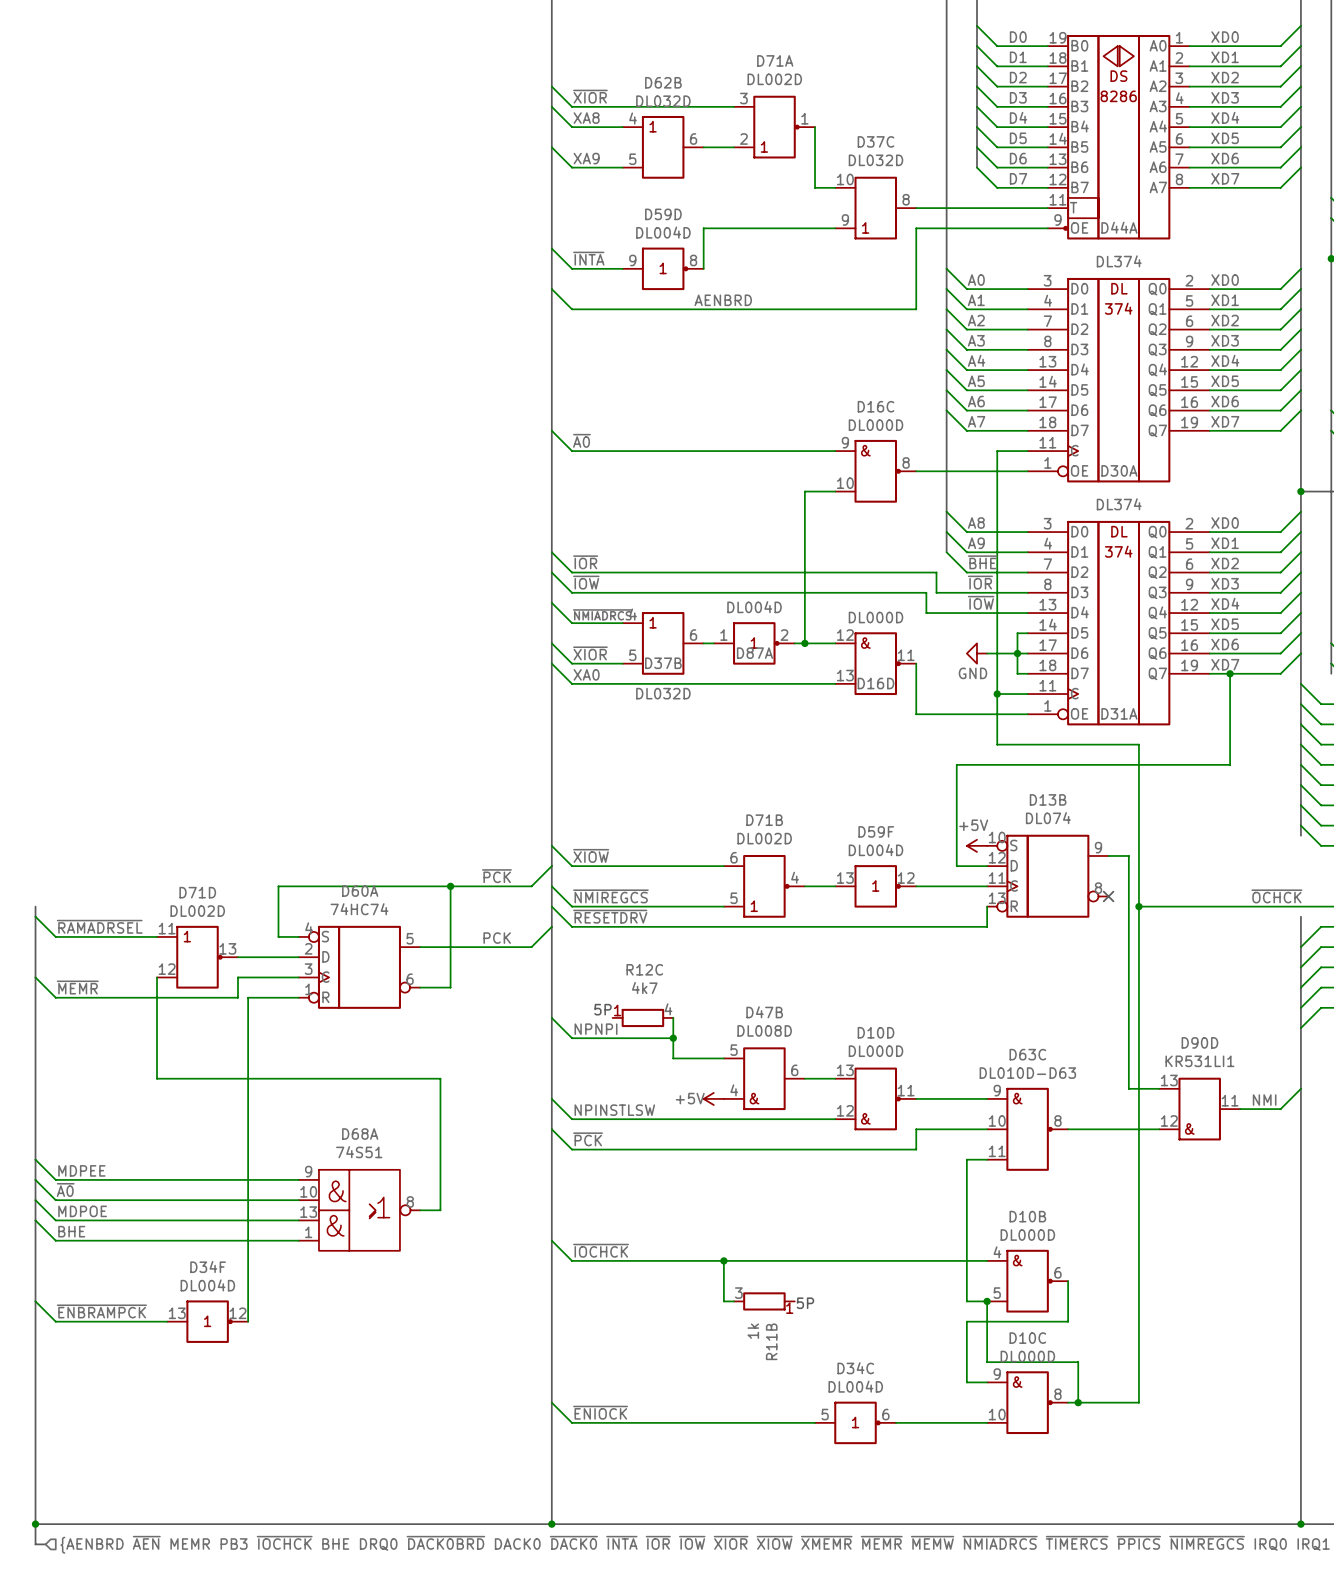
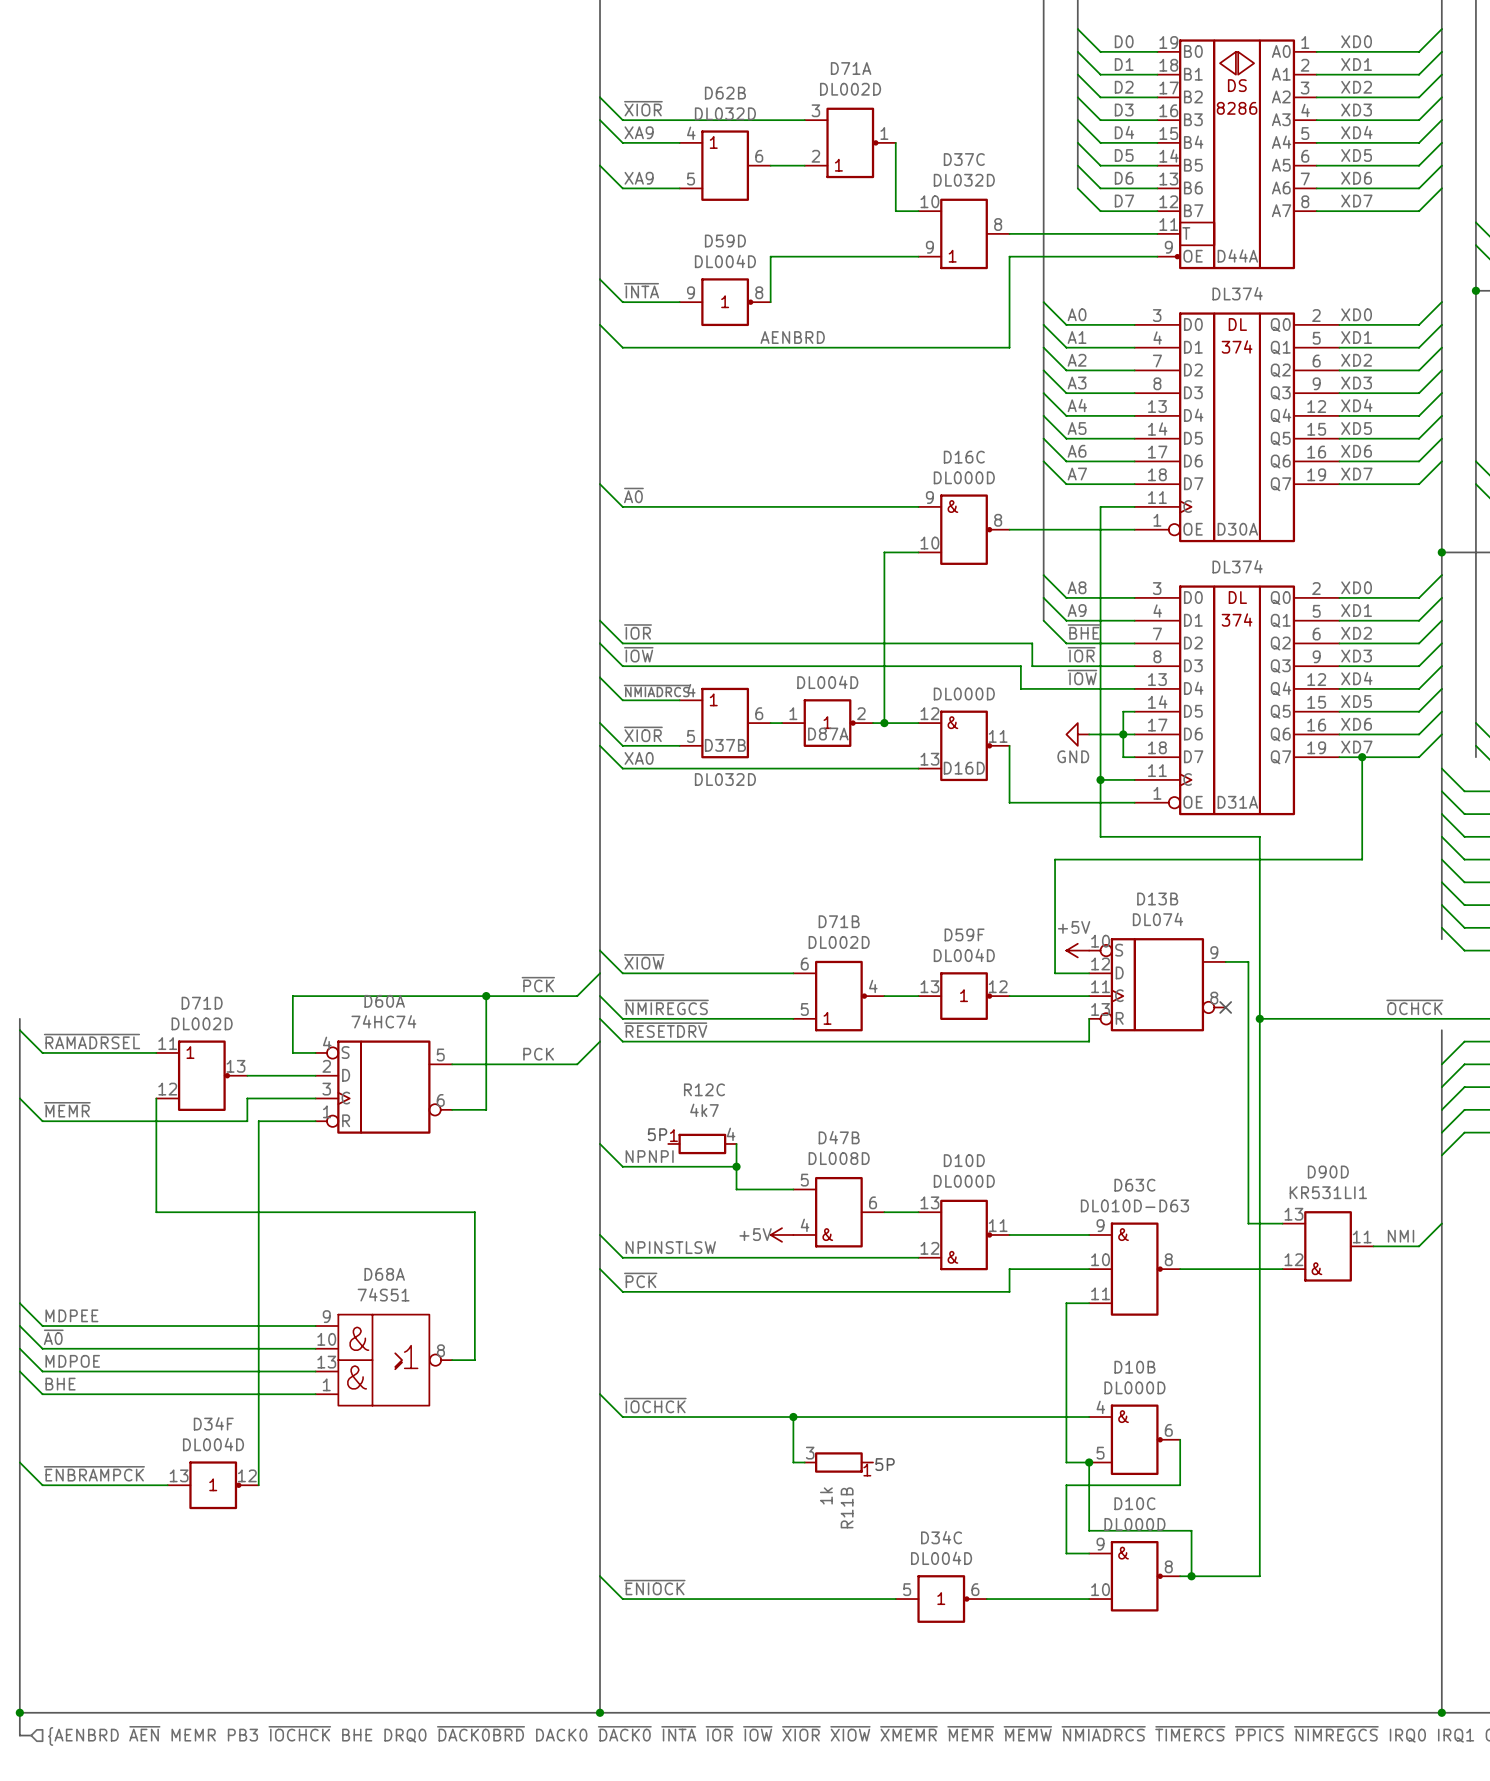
label: XA8 (586, 118) -> XA9 (639, 132)

